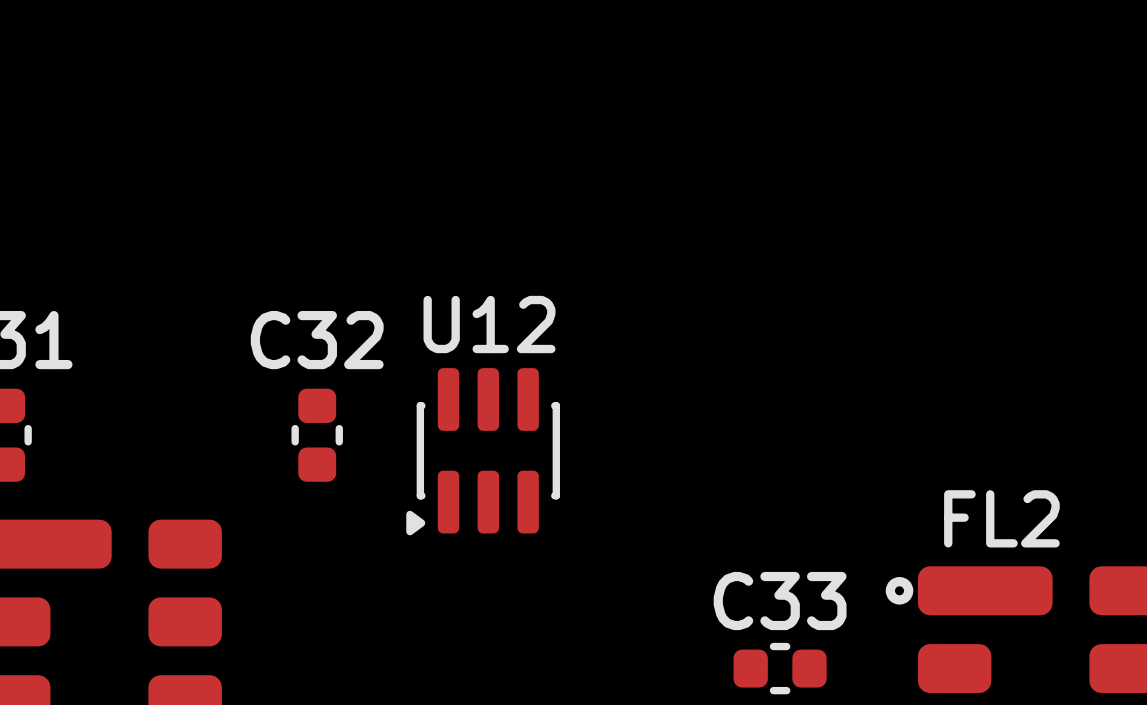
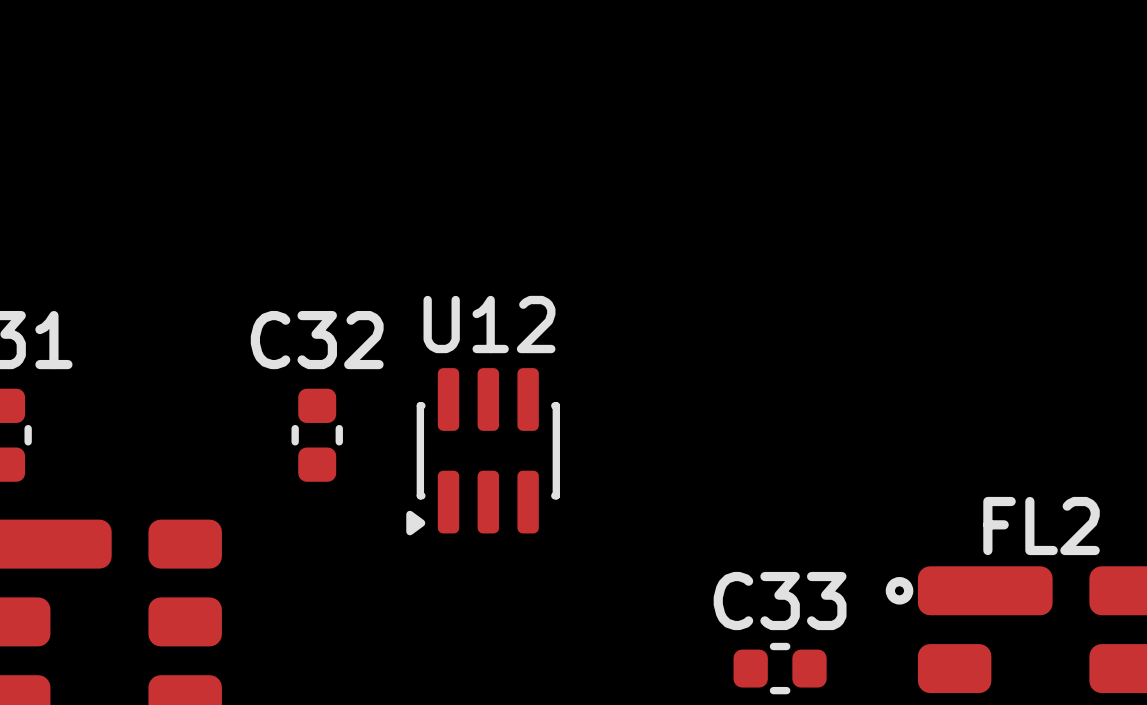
FL2 name position: FL2 (1001, 518) -> FL2 (1041, 526)

